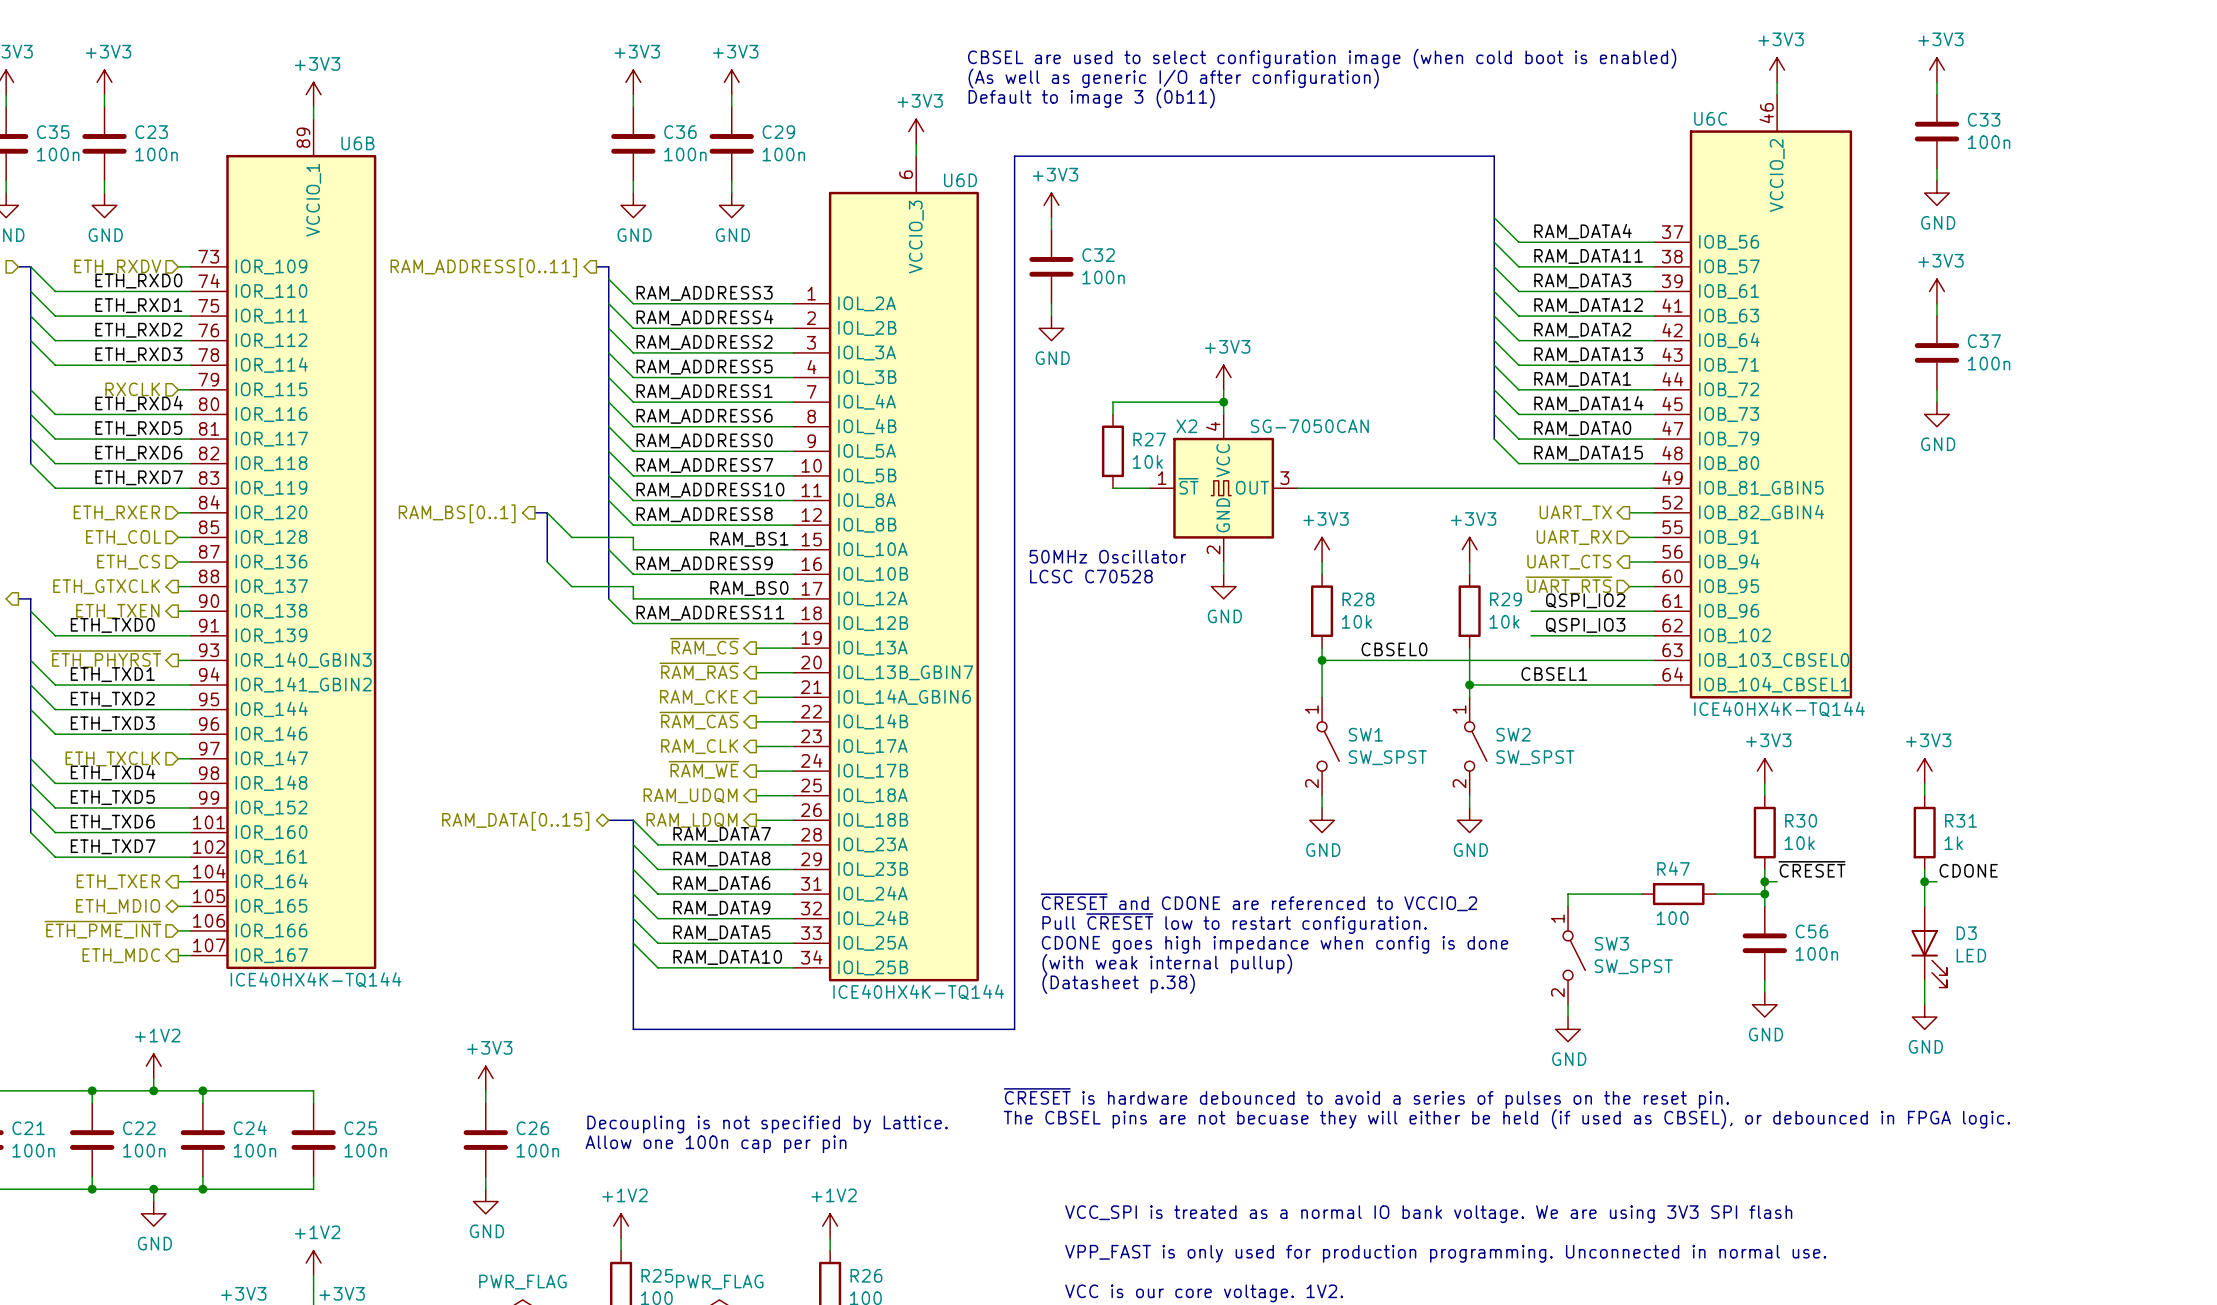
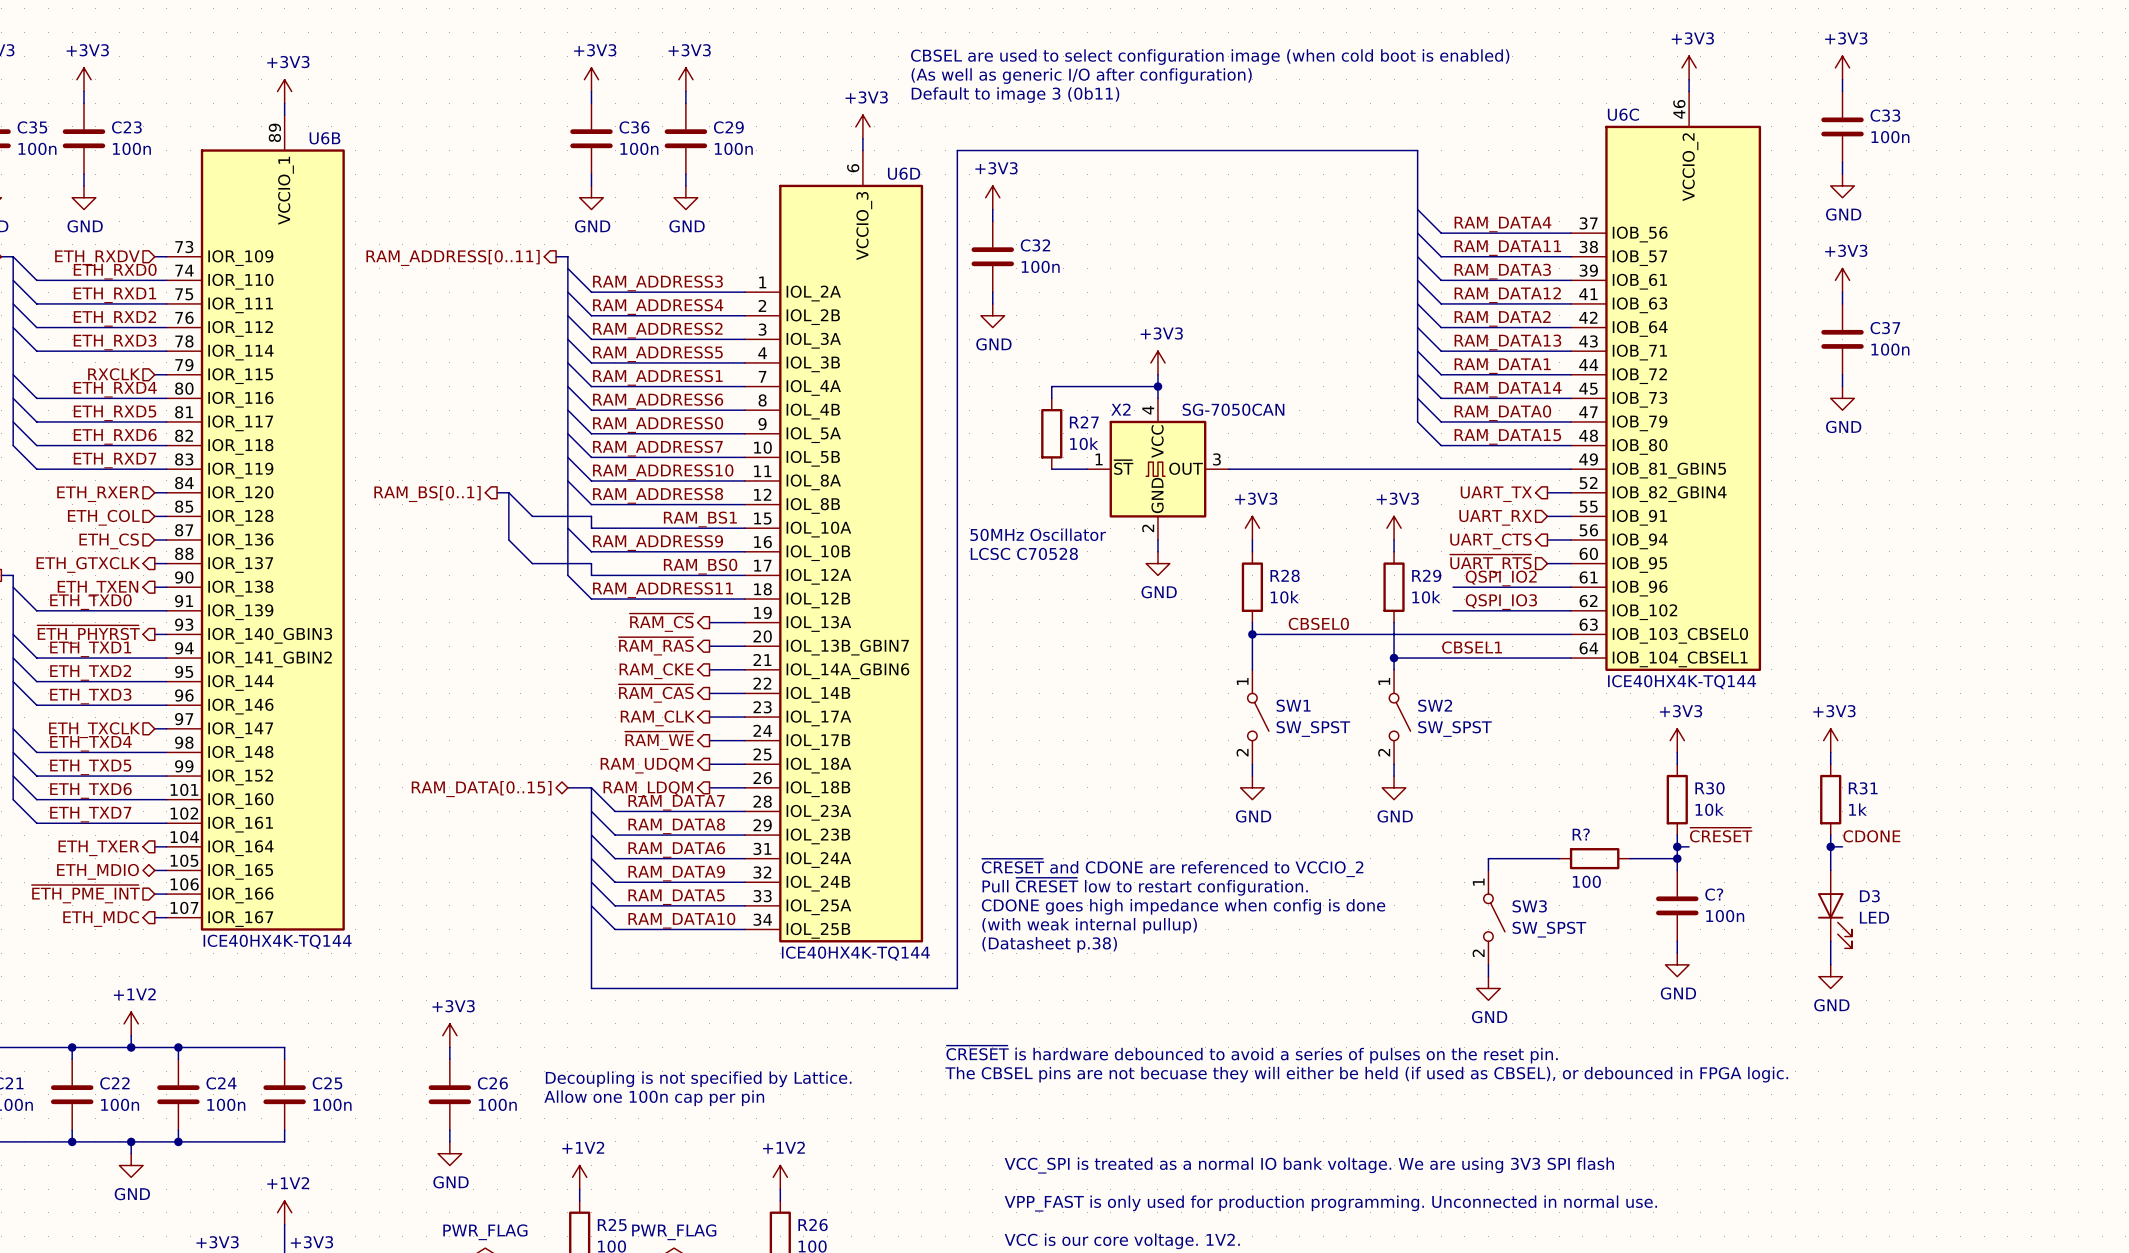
R47 name: R47 (1673, 868) -> R? (1581, 834)
C56 name: C56 (1811, 931) -> C? (1714, 894)

